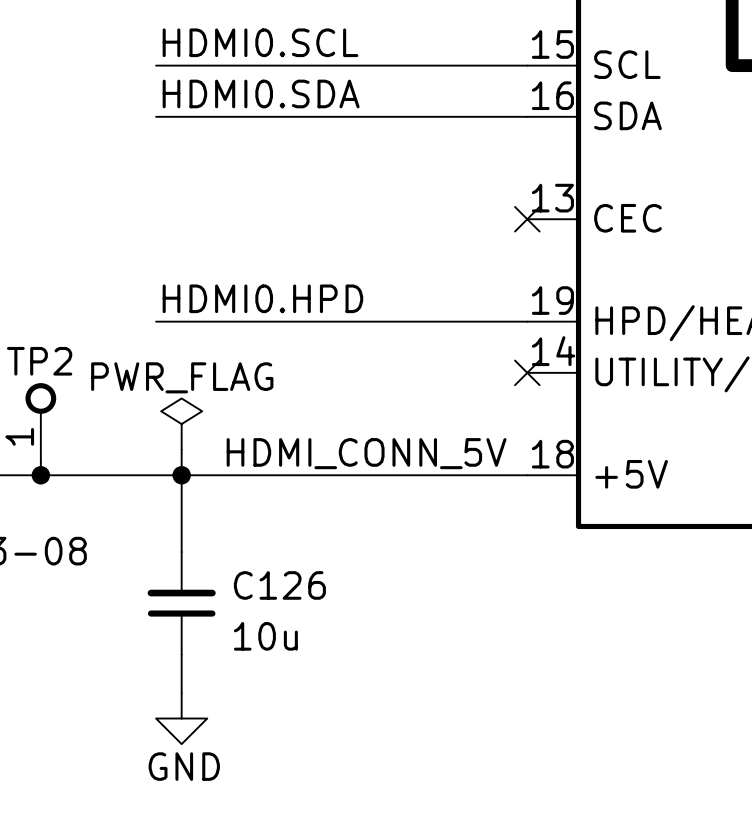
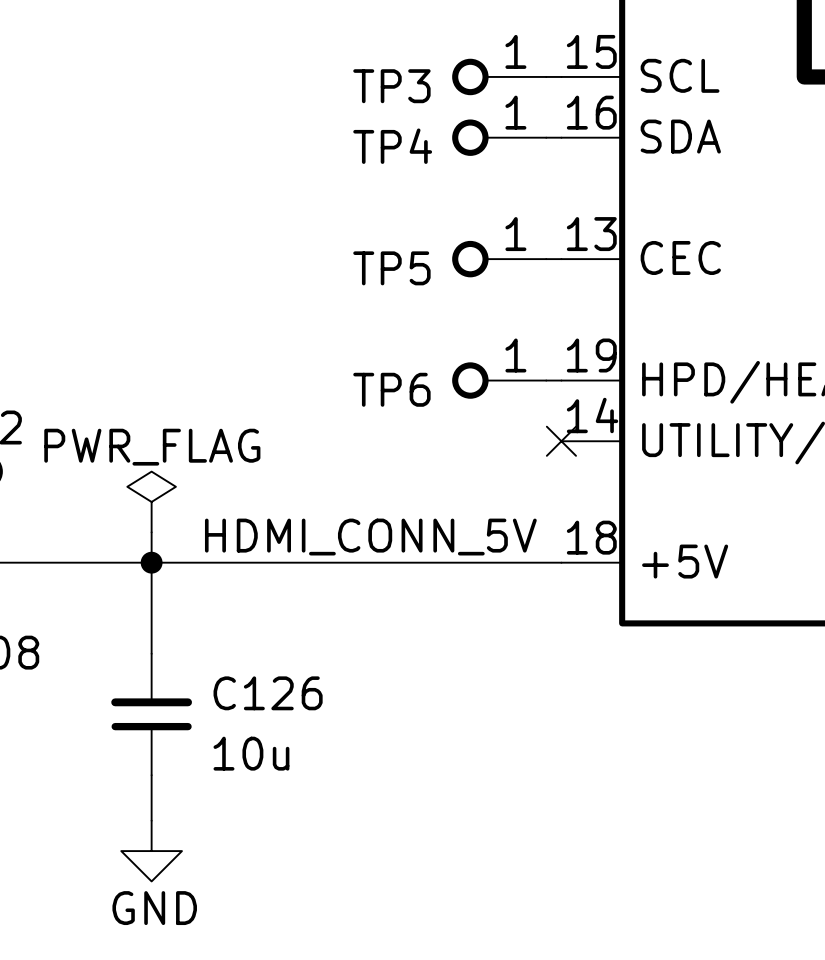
label: HDMI0.SCL (260, 42) -> none
wire: (156, 65) (514, 65) -> none
TP3: none -> (499, 76)
label: HDMI0.SDA (261, 93) -> none
wire: (156, 116) (514, 116) -> none
TP4: none -> (499, 137)
TP5: none -> (499, 259)
wire: none -> (546, 259) (561, 259)
no-connect mark: (527, 219) -> none
label: HDMI0.HPD (262, 298) -> none
wire: (156, 321) (514, 321) -> none
TP6: none -> (499, 380)

